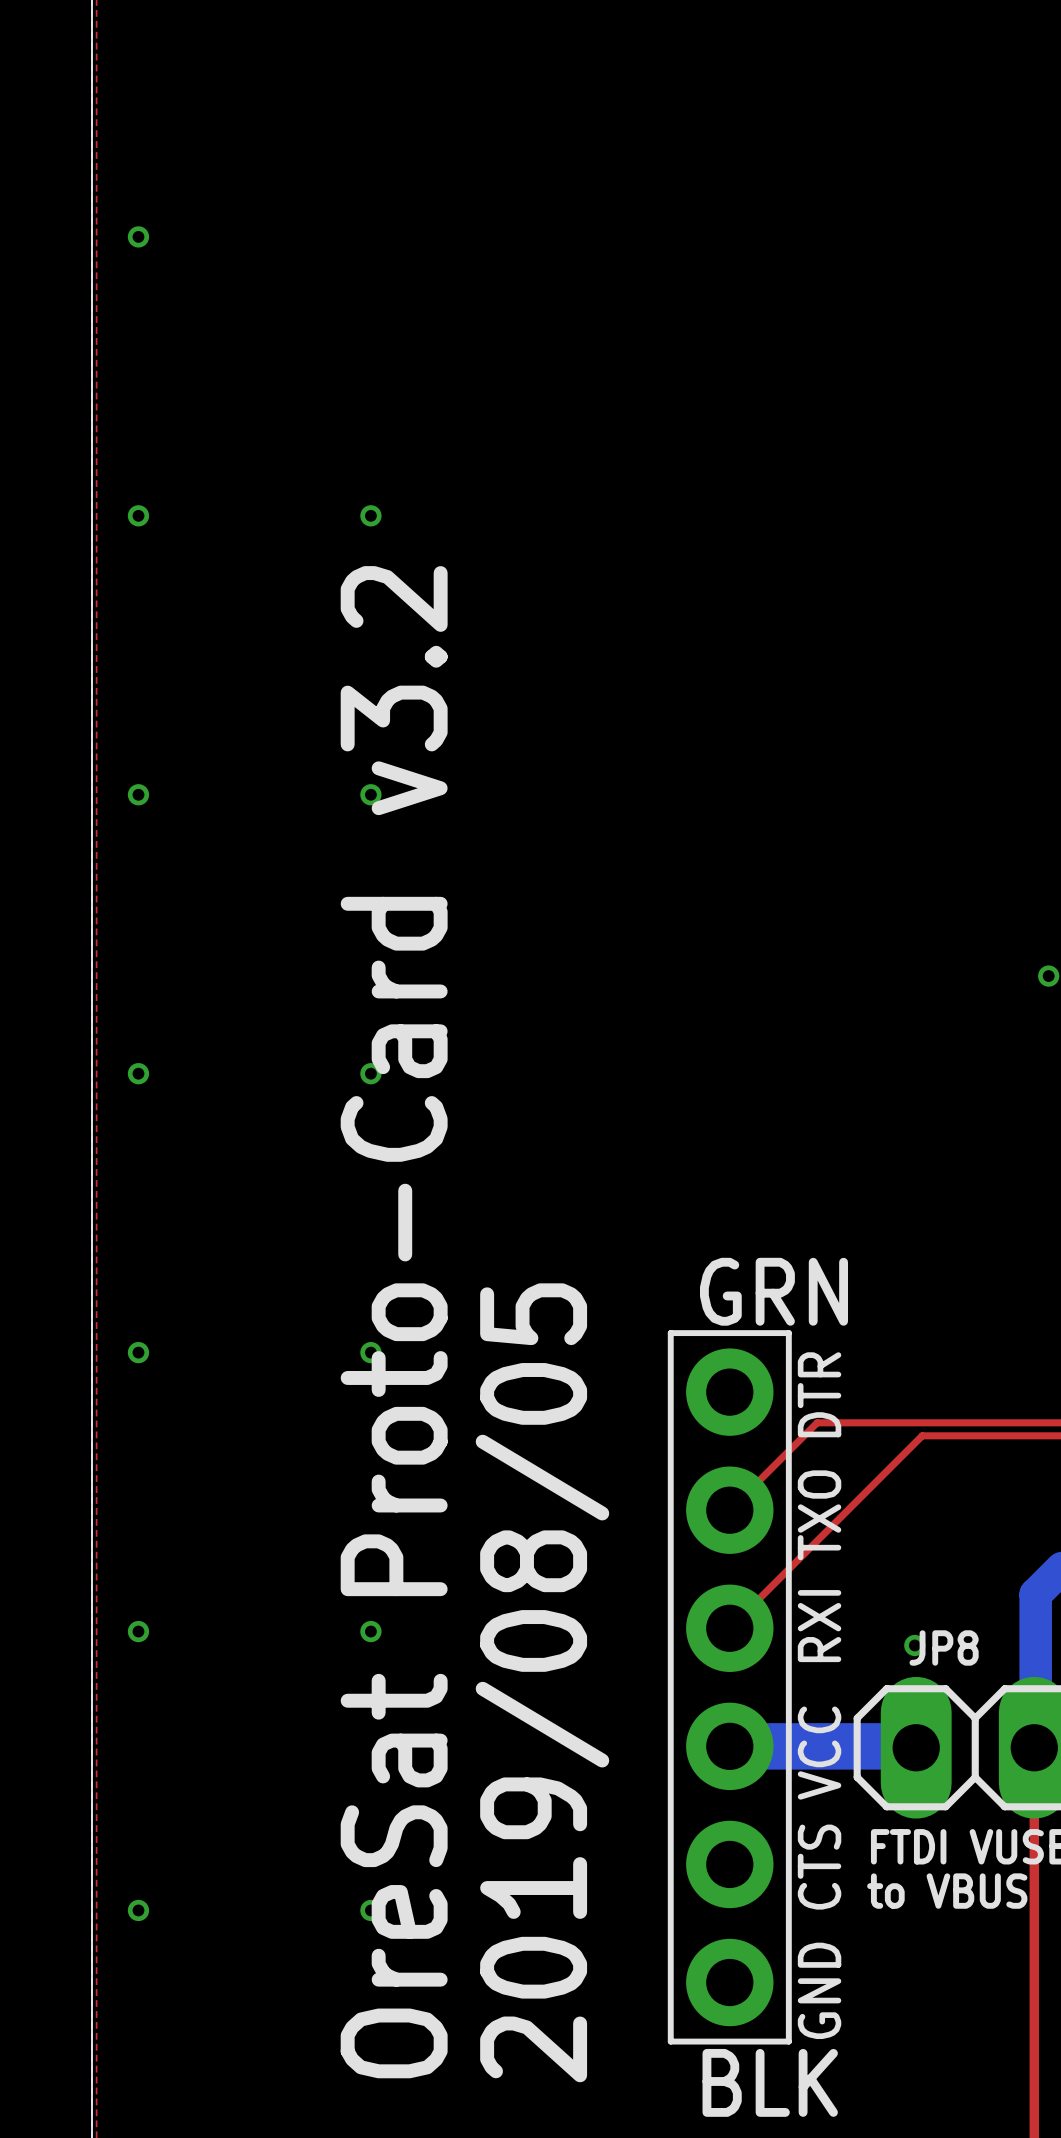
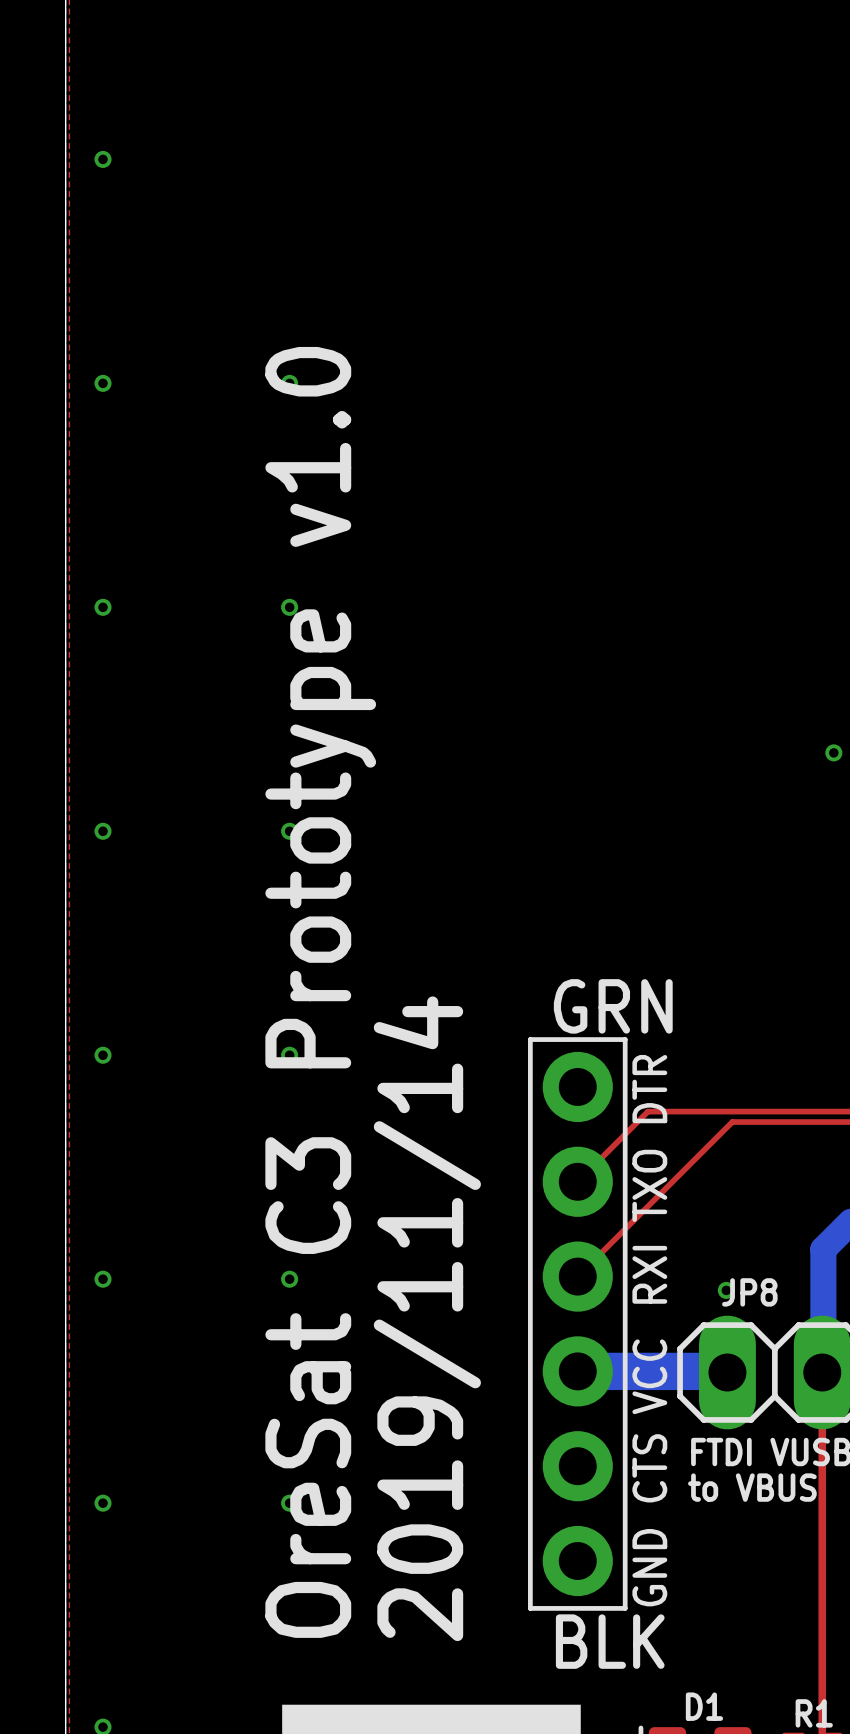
text: OreSat Proto-Card v3.2 (394, 1322) -> OreSat C3 Prototype v1.0 (320, 992)
text: 2019/08/05 (542, 1682) -> 2019/11/14 (427, 1318)

